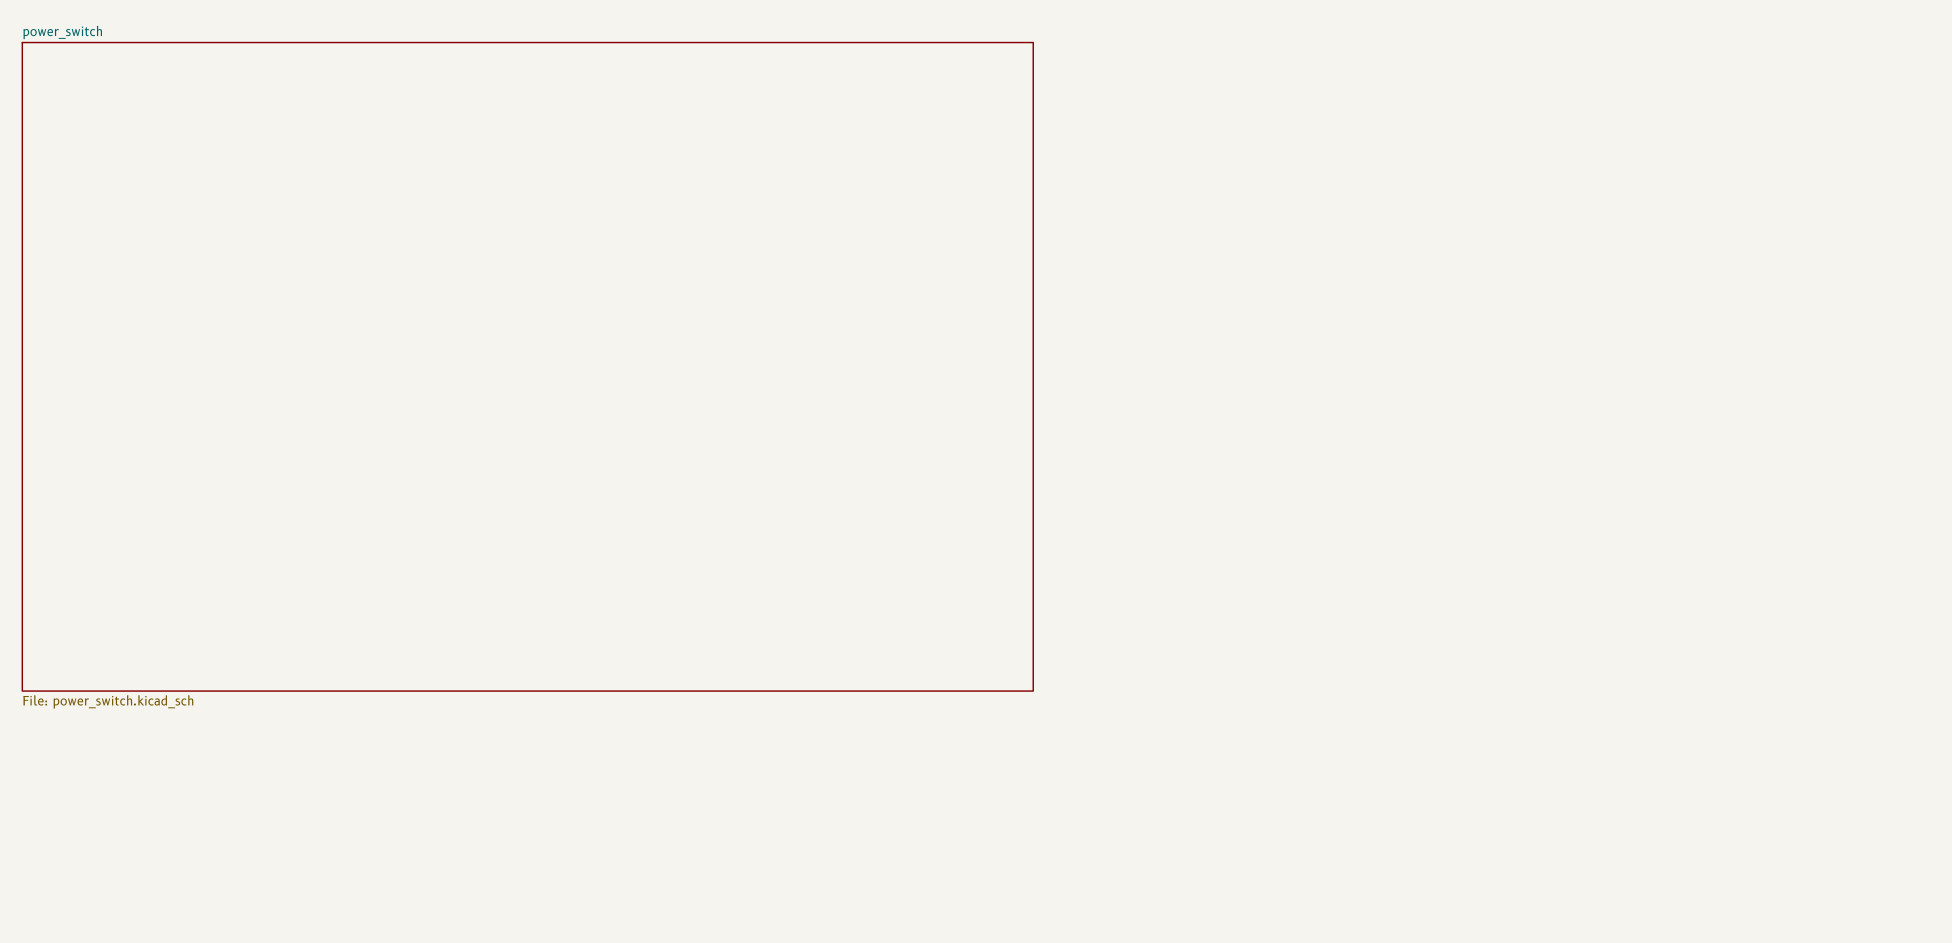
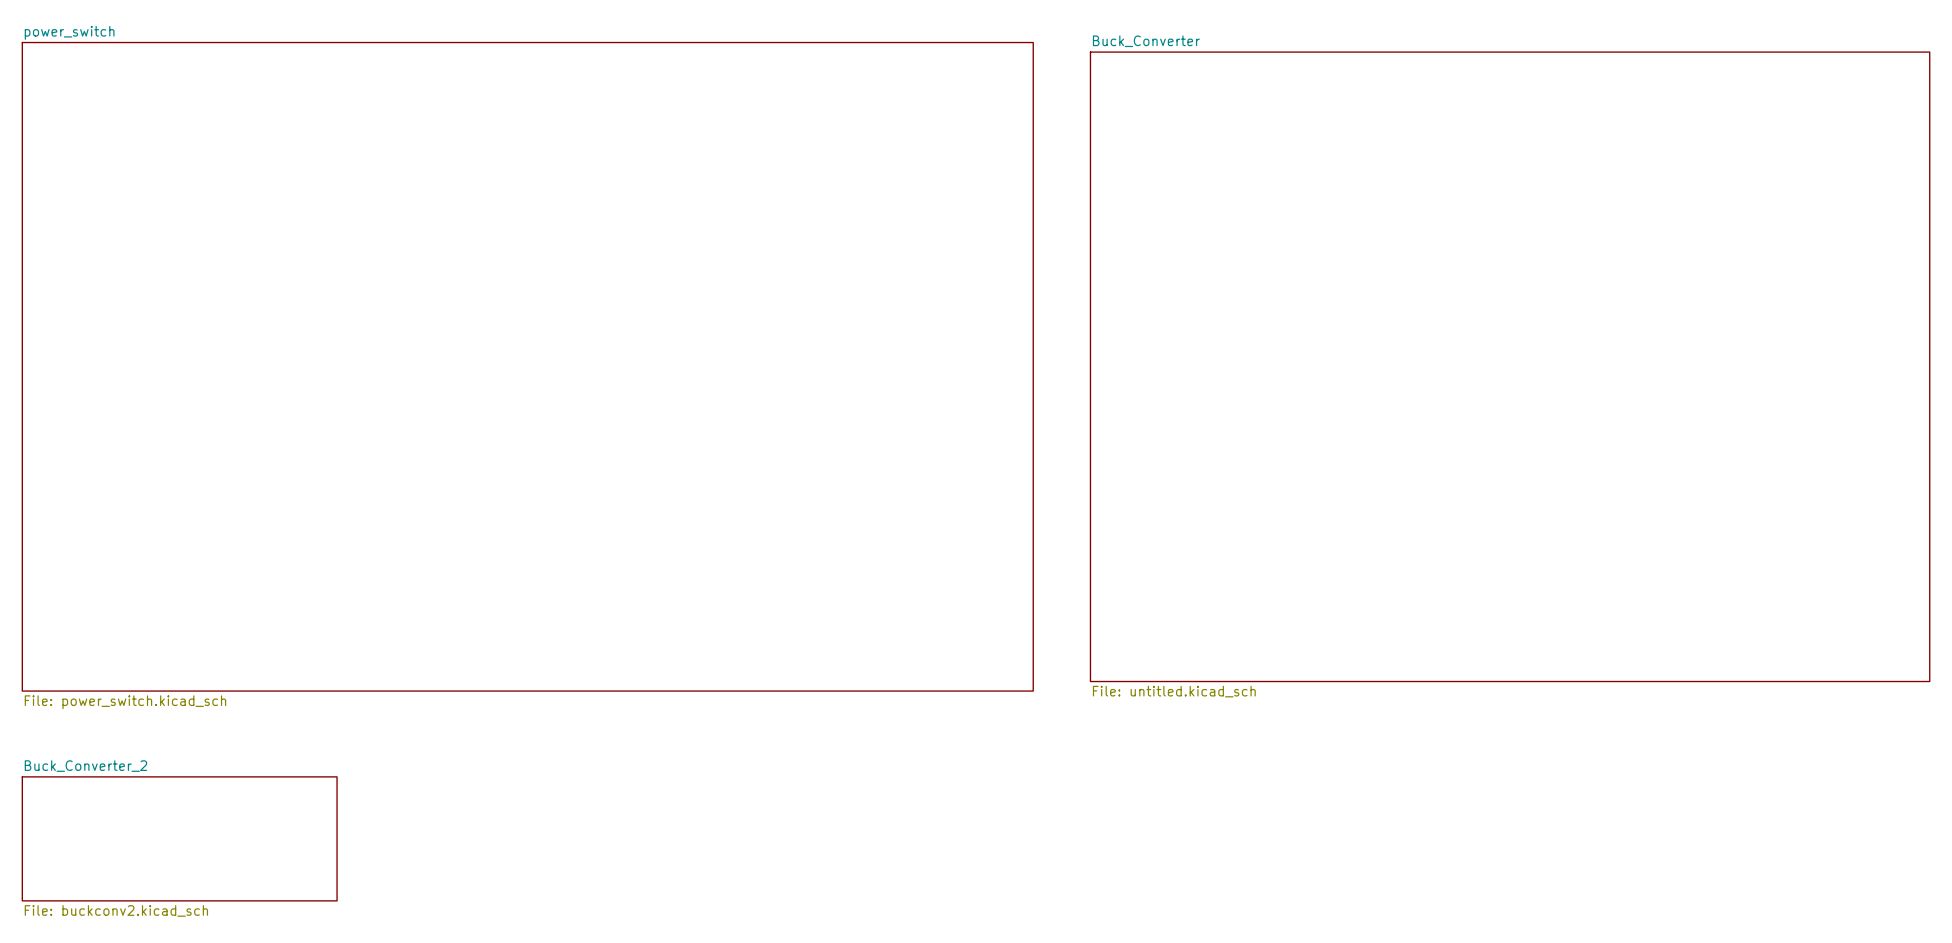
sheet Buck_Converter: none -> File: untitled.kicad_sch (1510, 366)
sheet Buck_Converter_2: none -> File: buckconv2.kicad_sch (179, 838)

